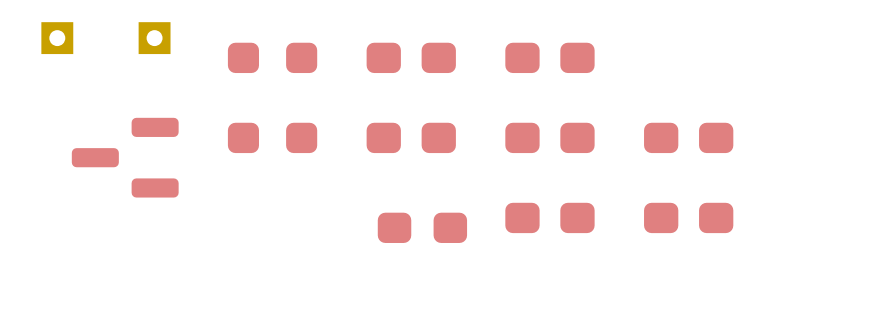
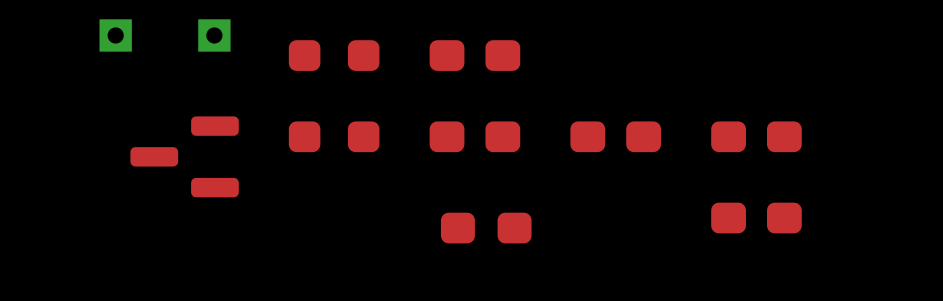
part: (549, 57) -> none
part: (549, 217) -> none

